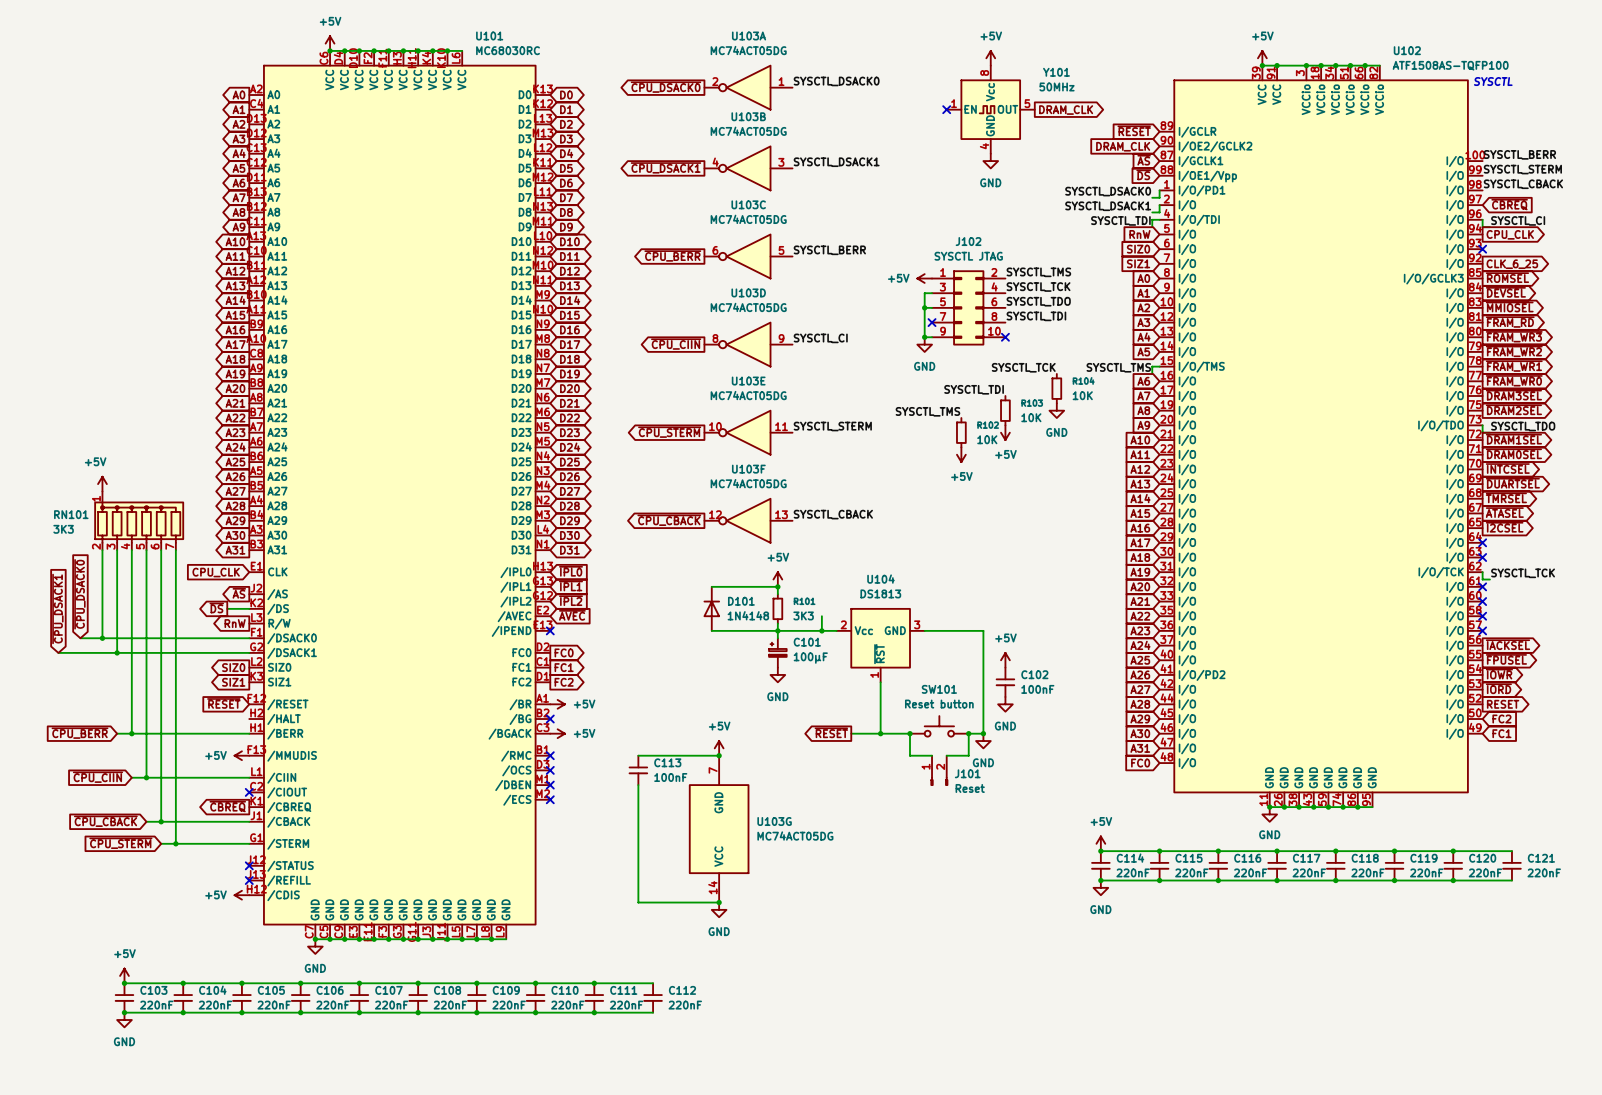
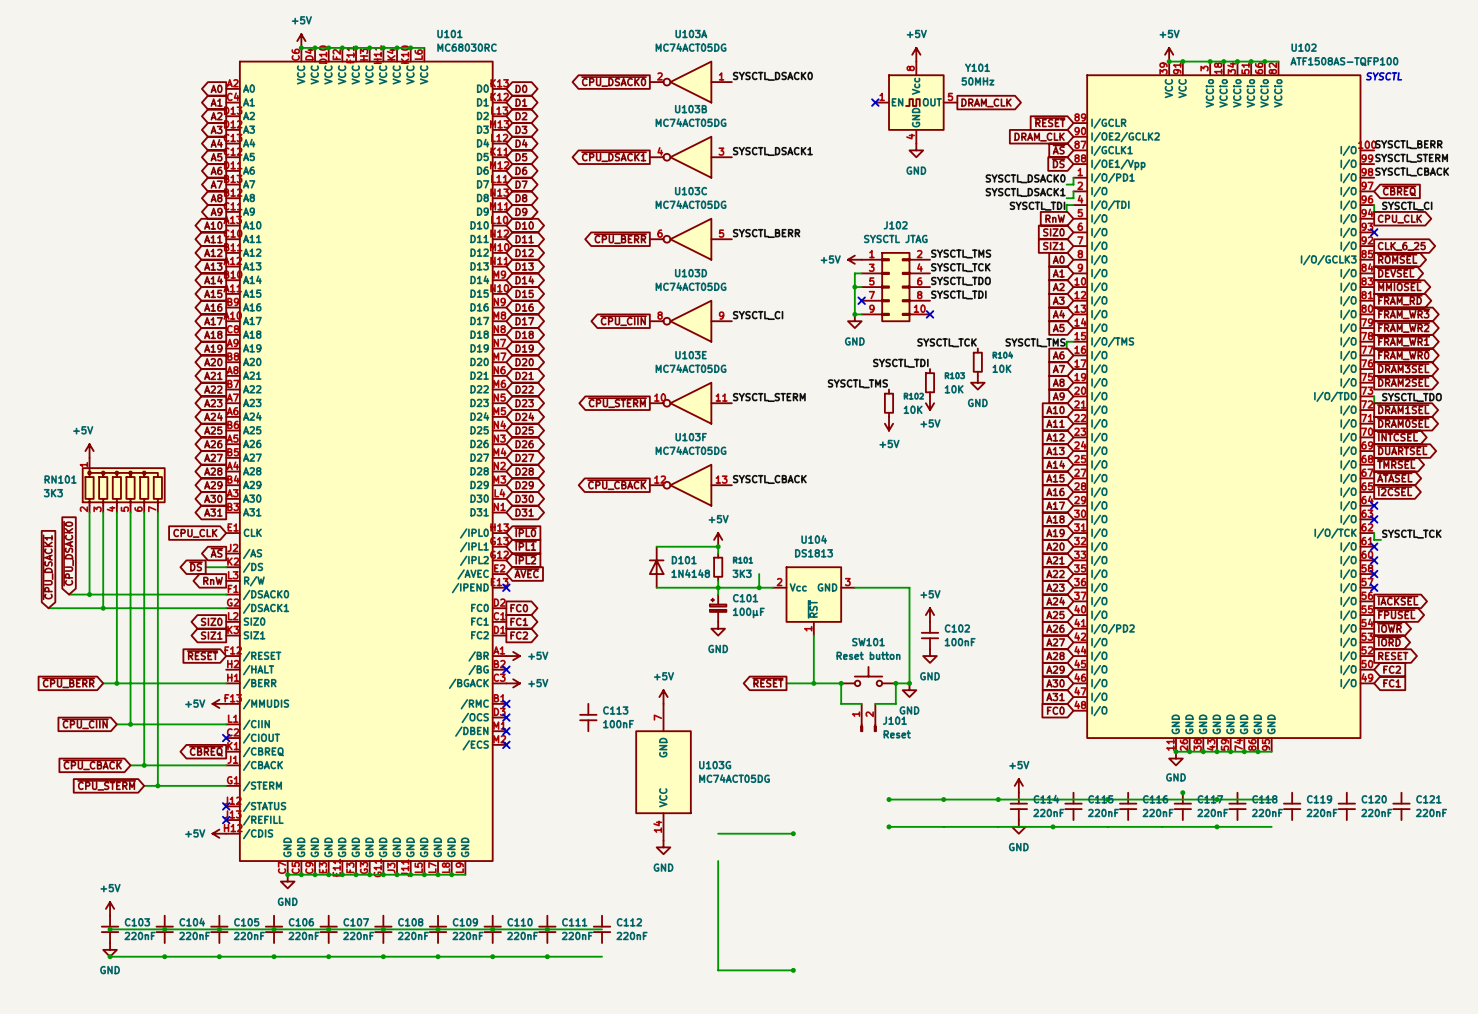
wire: (638, 755) (719, 755) -> none
junction: (719, 755) -> none
wire: (638, 785) (638, 902) (719, 902) -> none
wire: (1100, 851) (1511, 851) -> (889, 799) (1271, 799)
junction: (1100, 851) -> none
junction: (1159, 851) -> none
junction: (1218, 851) -> none
junction: (1335, 851) -> none
junction: (1394, 851) -> none
junction: (1453, 851) -> none
junction: none -> (889, 799)
junction: none -> (943, 799)
junction: none -> (998, 799)
junction: none -> (1107, 799)
junction: none -> (1216, 799)
wire: (1100, 880) (1511, 880) -> (889, 826) (1271, 826)
junction: (1100, 880) -> none
junction: (1159, 880) -> none
junction: (1218, 880) -> none
junction: (1277, 880) -> none
junction: (1335, 880) -> none
junction: (1394, 880) -> none
junction: (1453, 880) -> none
junction: none -> (889, 826)
junction: none -> (1052, 826)
junction: none -> (1216, 826)
wire: none -> (718, 833) (793, 833)
junction: none -> (793, 833)
junction: (719, 902) -> none
wire: none -> (718, 861) (718, 970) (793, 970)
wire: (124, 983) (653, 983) -> (110, 929) (602, 929)
junction: (124, 983) -> none
junction: (183, 983) -> none
junction: (241, 983) -> none
junction: (300, 983) -> none
junction: (359, 983) -> none
junction: (418, 983) -> none
junction: (476, 983) -> none
junction: (535, 983) -> none
junction: (594, 983) -> none
junction: none -> (110, 929)
junction: none -> (164, 929)
junction: none -> (219, 929)
junction: none -> (274, 929)
junction: none -> (328, 929)
junction: none -> (383, 929)
junction: none -> (438, 929)
junction: none -> (492, 929)
junction: none -> (547, 929)
wire: (124, 1012) (653, 1012) -> (110, 956) (602, 956)
junction: (124, 1012) -> none
junction: (183, 1012) -> none
junction: (241, 1012) -> none
junction: (300, 1012) -> none
junction: (359, 1012) -> none
junction: (418, 1012) -> none
junction: (476, 1012) -> none
junction: (535, 1012) -> none
junction: (594, 1012) -> none
junction: none -> (110, 956)
junction: none -> (164, 956)
junction: none -> (219, 956)
junction: none -> (274, 956)
junction: none -> (328, 956)
junction: none -> (383, 956)
junction: none -> (438, 956)
junction: none -> (492, 956)
junction: none -> (547, 956)
junction: none -> (793, 970)

